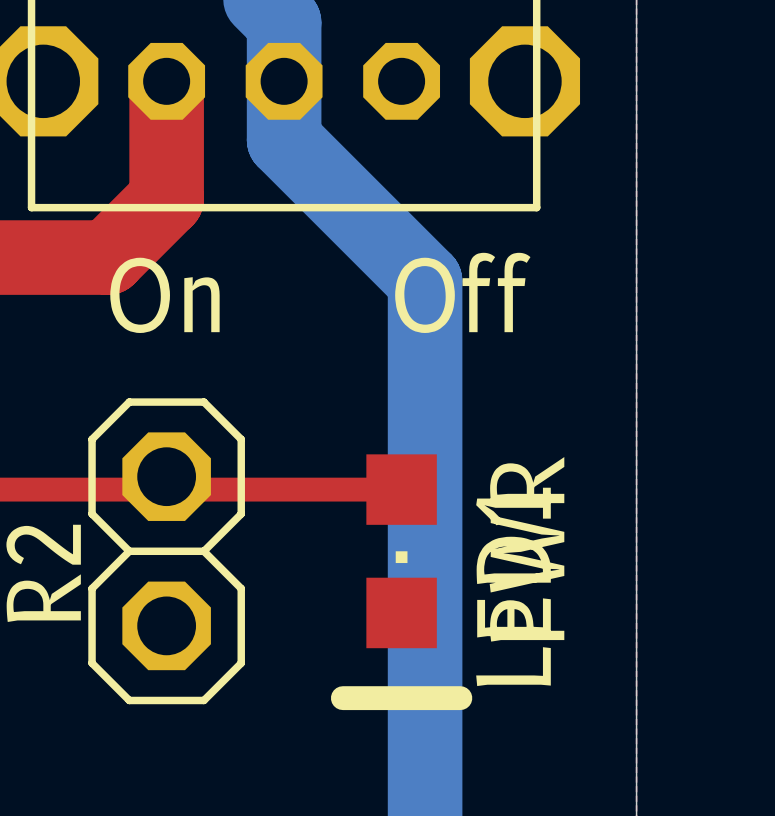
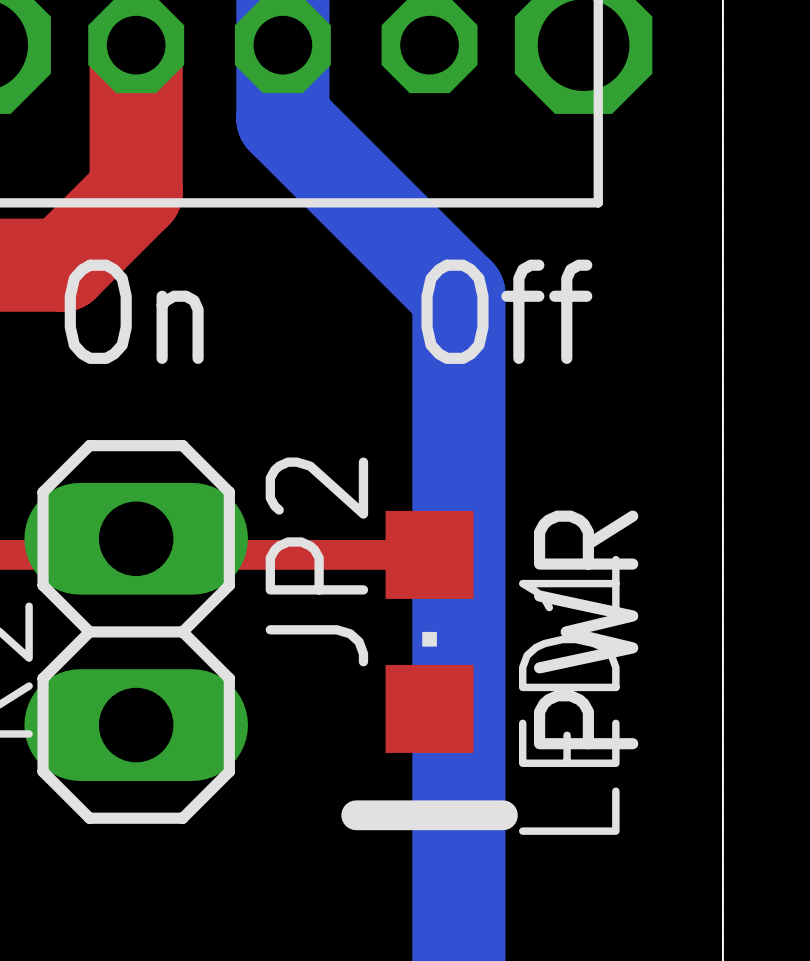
part: (166, 551) -> none
JP2: none -> (136, 631)

